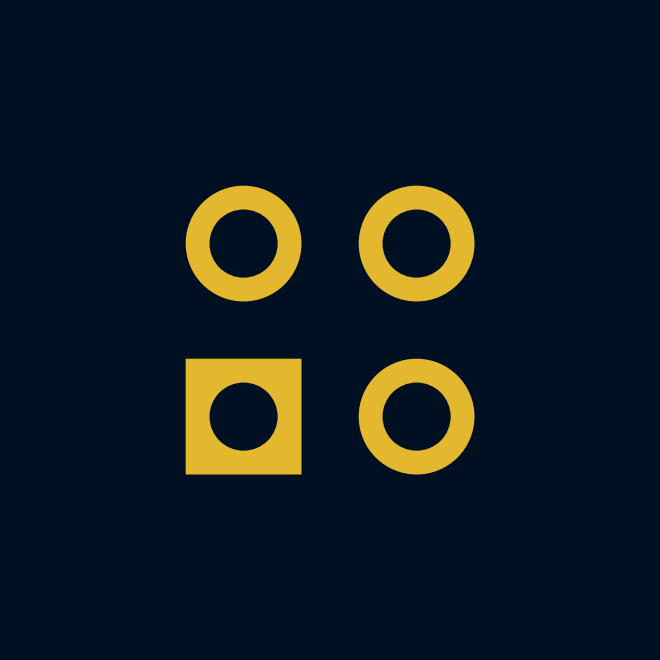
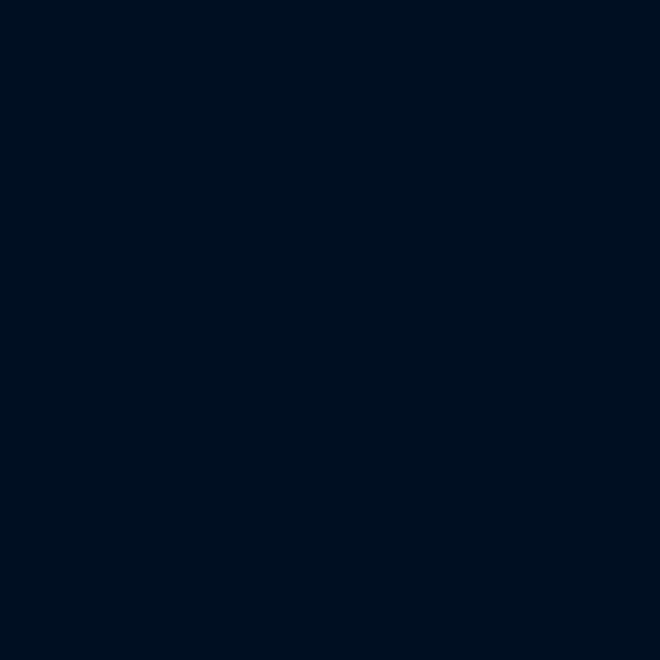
part: (330, 330) -> none

